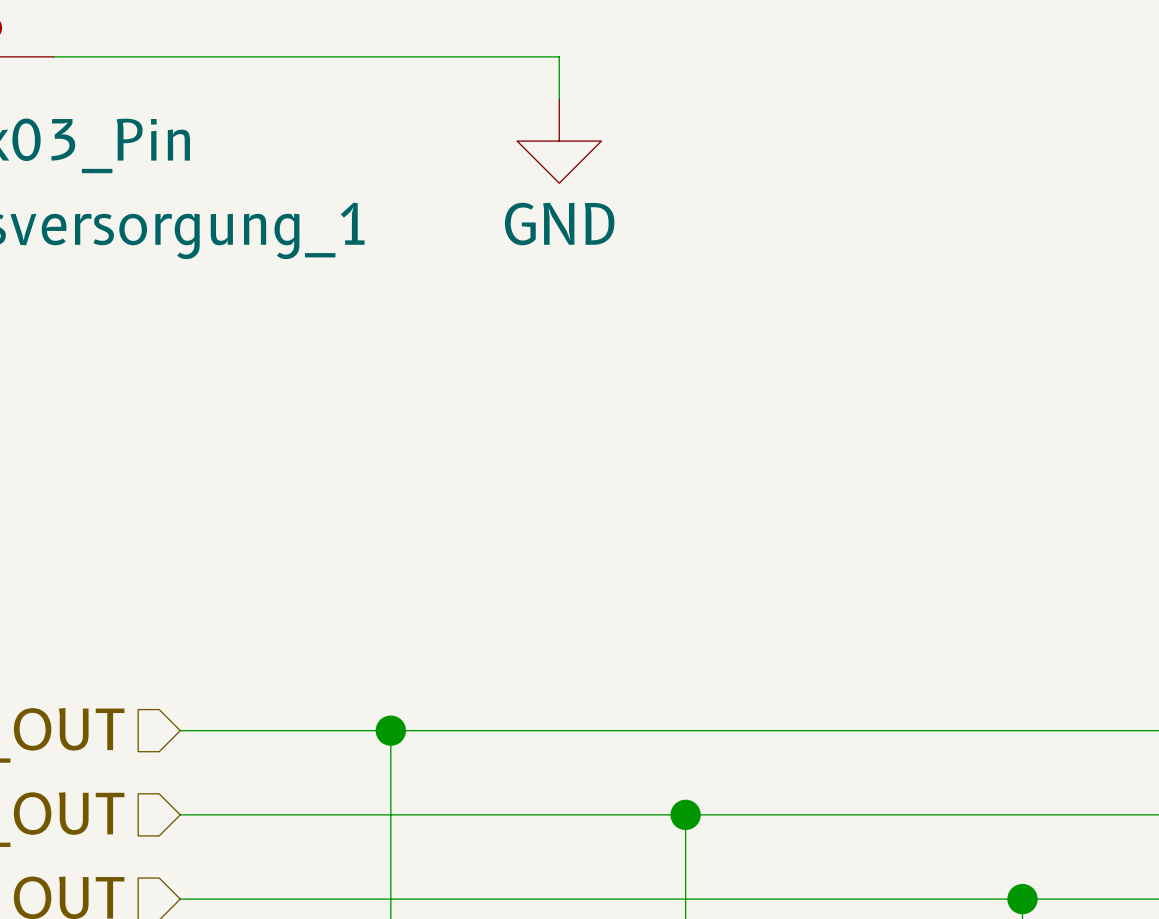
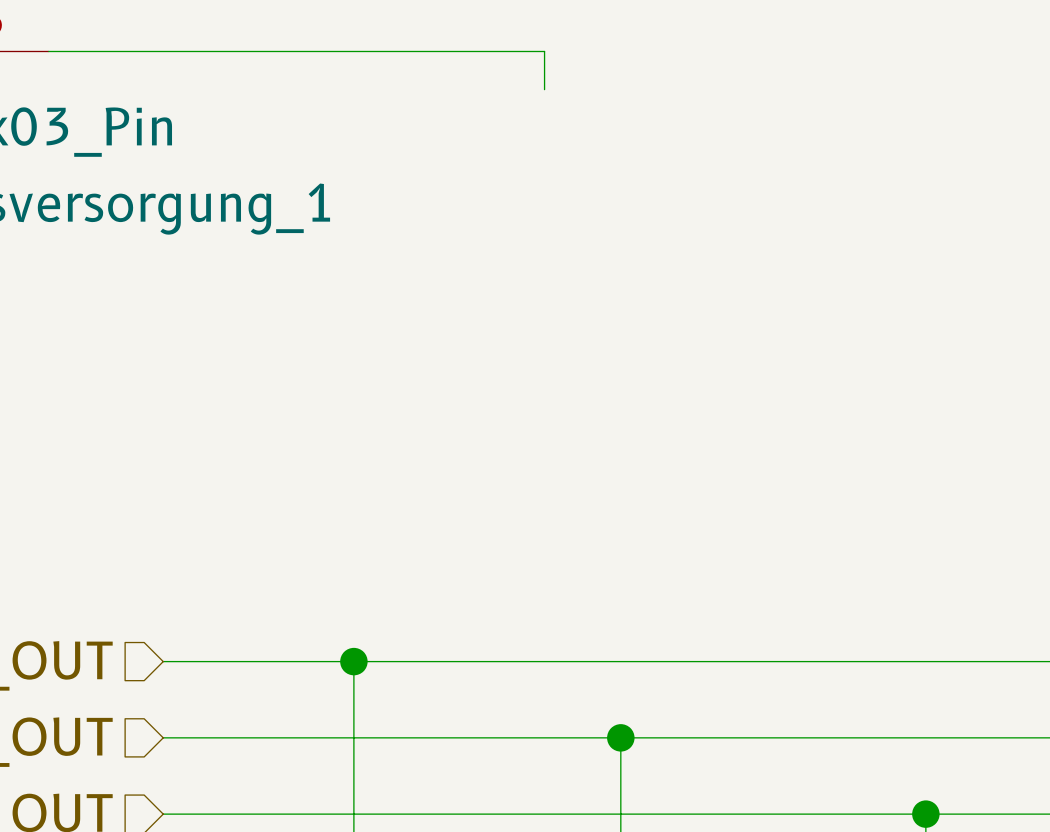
wire: (559, 56) (559, 98) -> (506, 51) (544, 51) (544, 89)
power symbol: GND (559, 141) -> none

